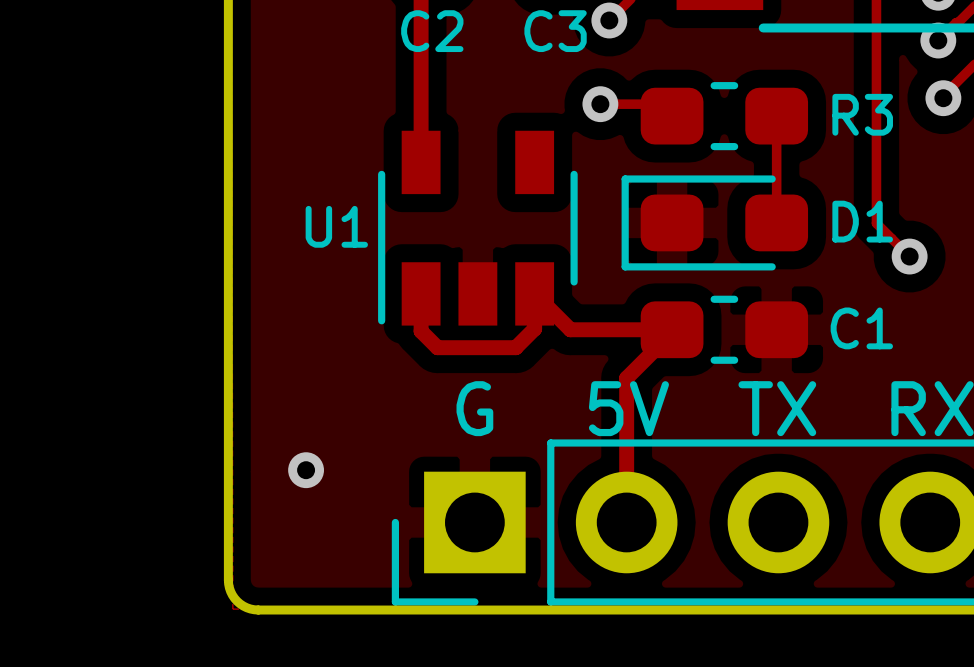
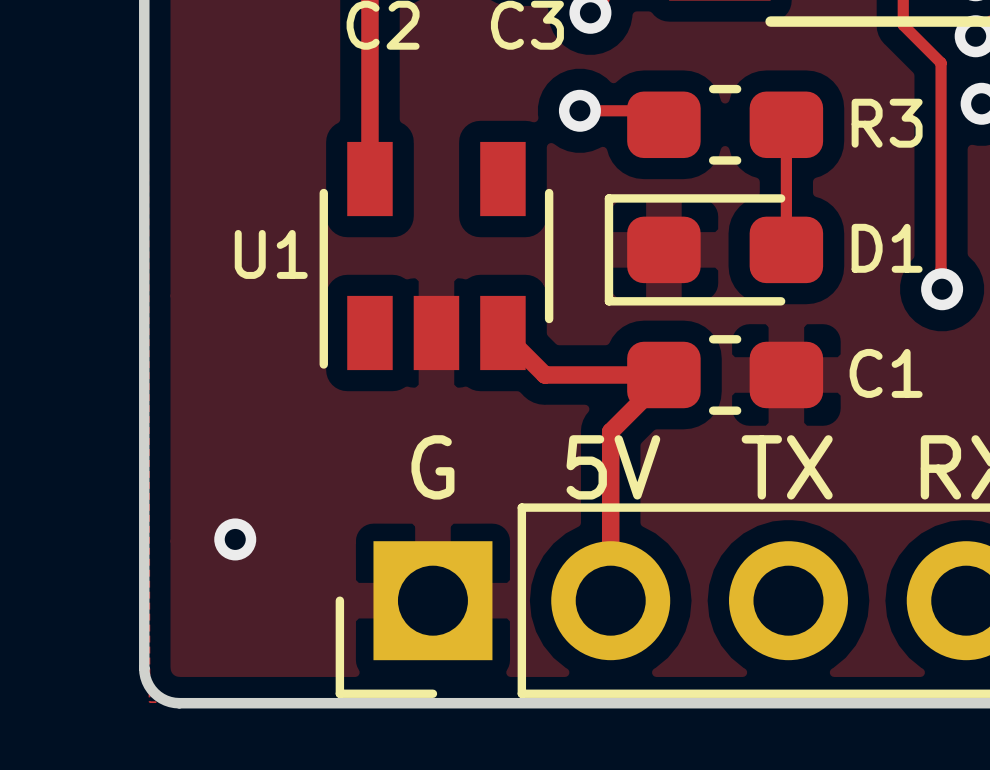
track: (876, 31) (876, 223) (908, 255) -> (903, 25) (941, 62) (941, 288)
track: (421, 293) (421, 331) (437, 347) (515, 347) (534, 328) (534, 293) -> none

